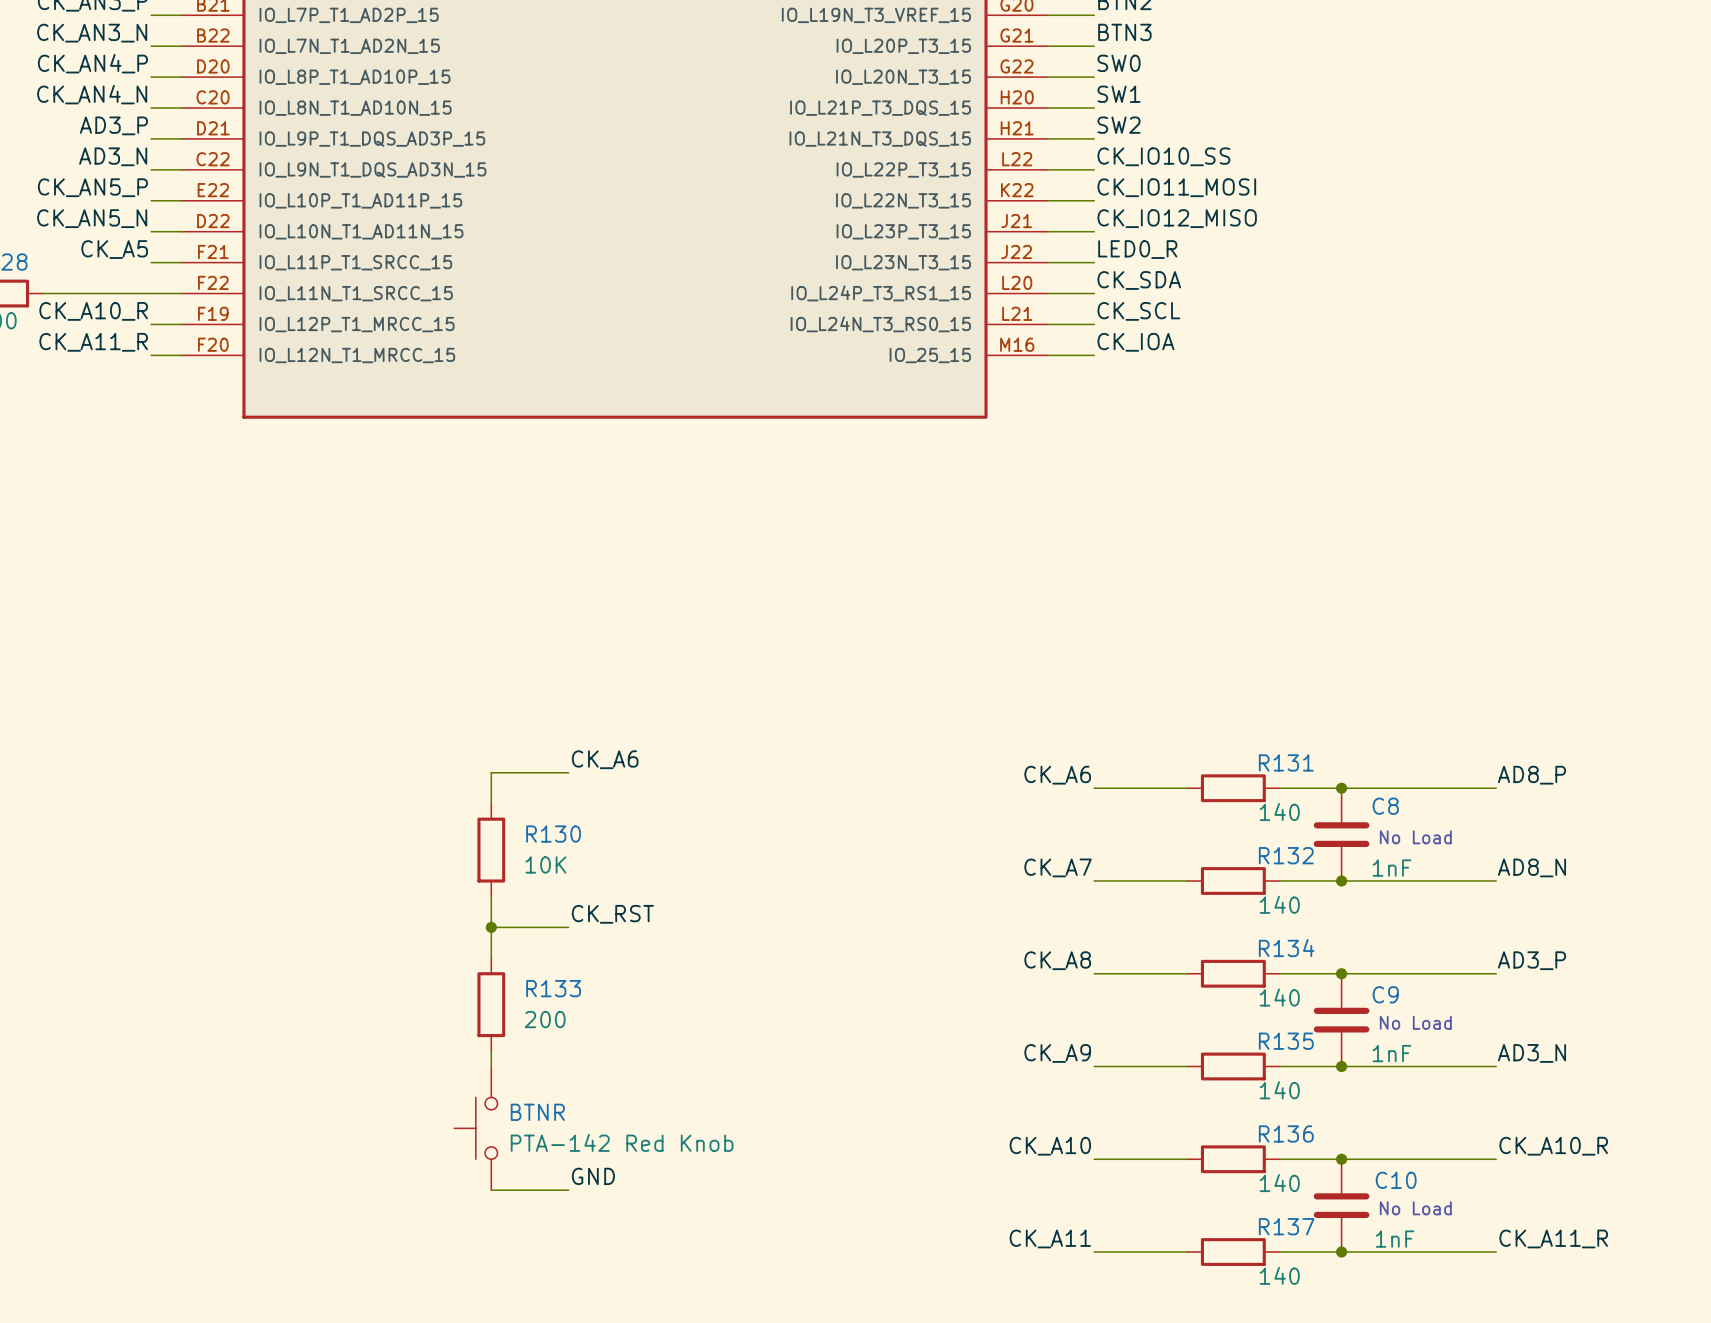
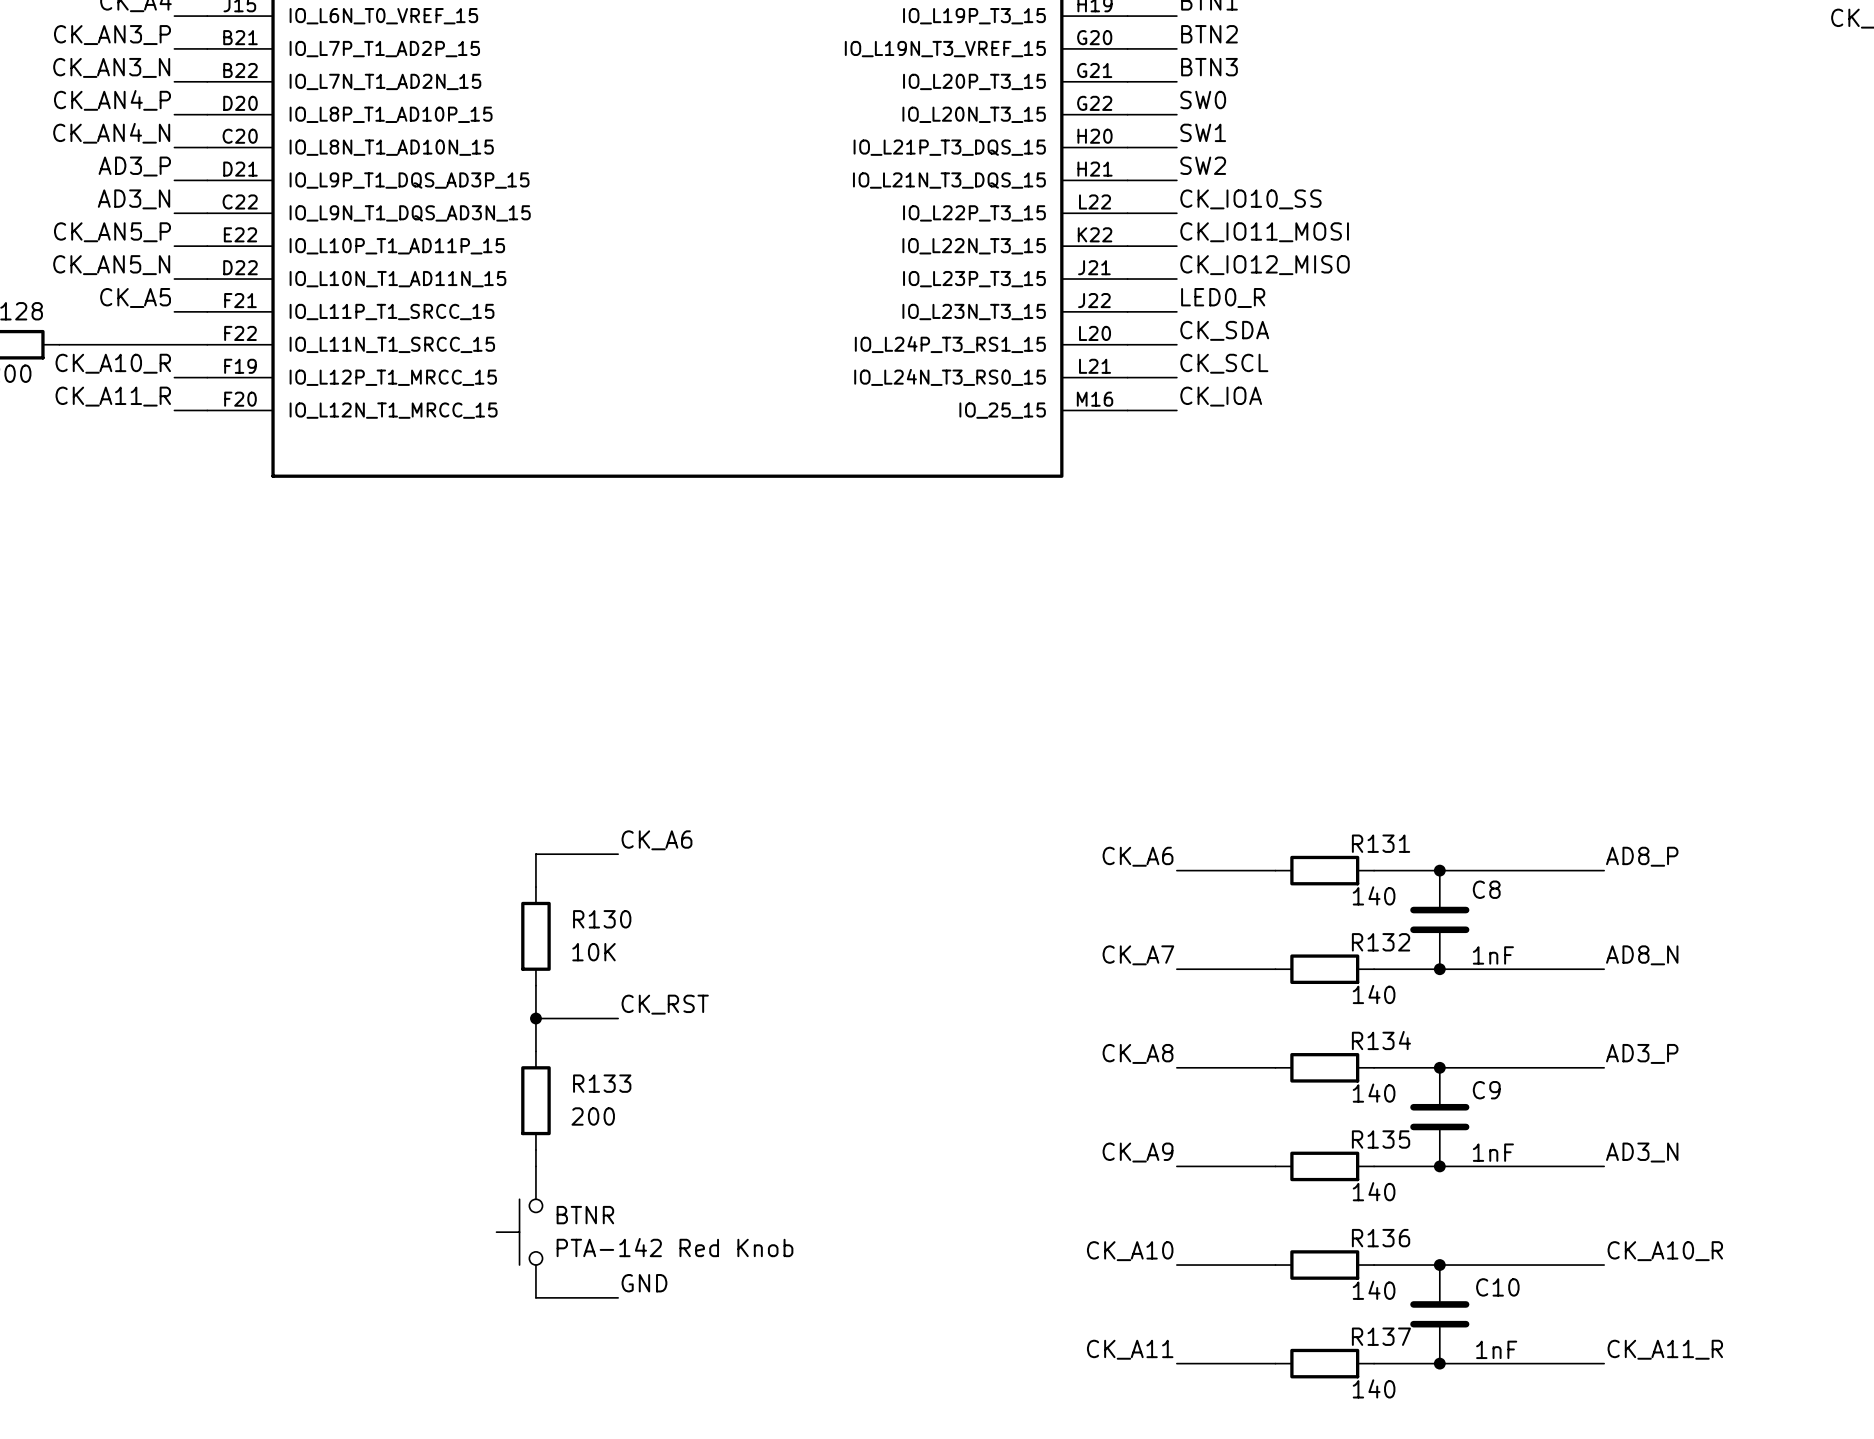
text: No Load (1415, 837) -> none
text: No Load (1415, 1022) -> none
text: No Load (1415, 1208) -> none

